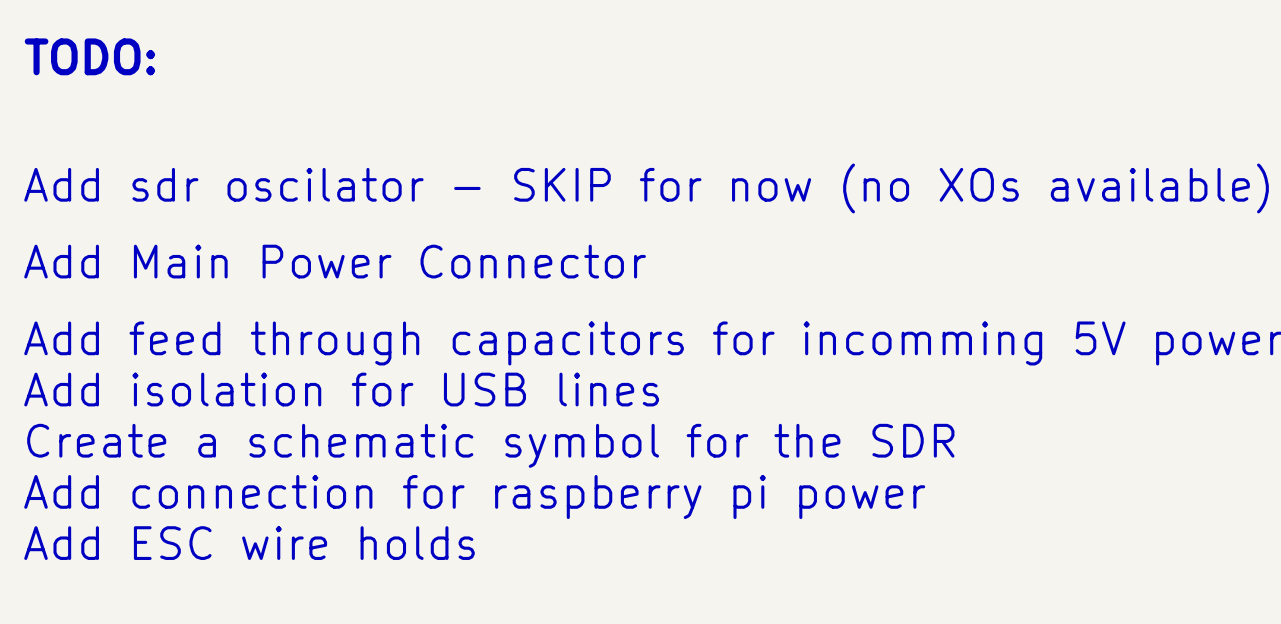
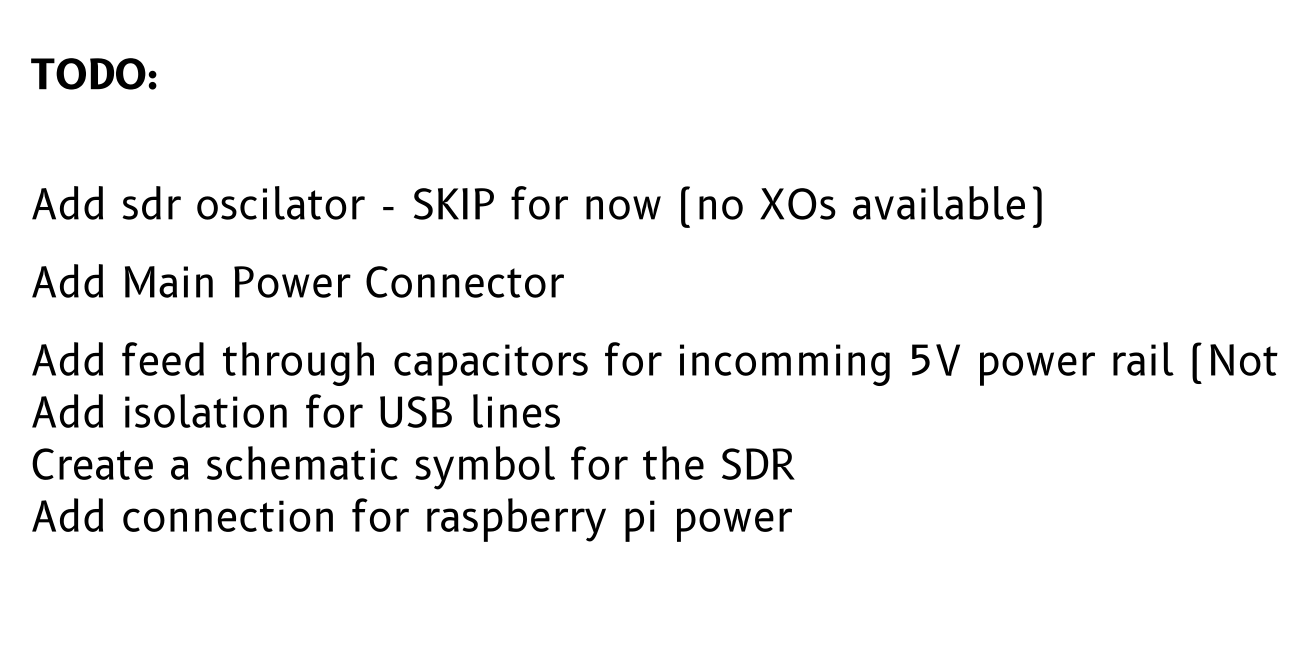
text: Add ESC wire holds (249, 543) -> none

